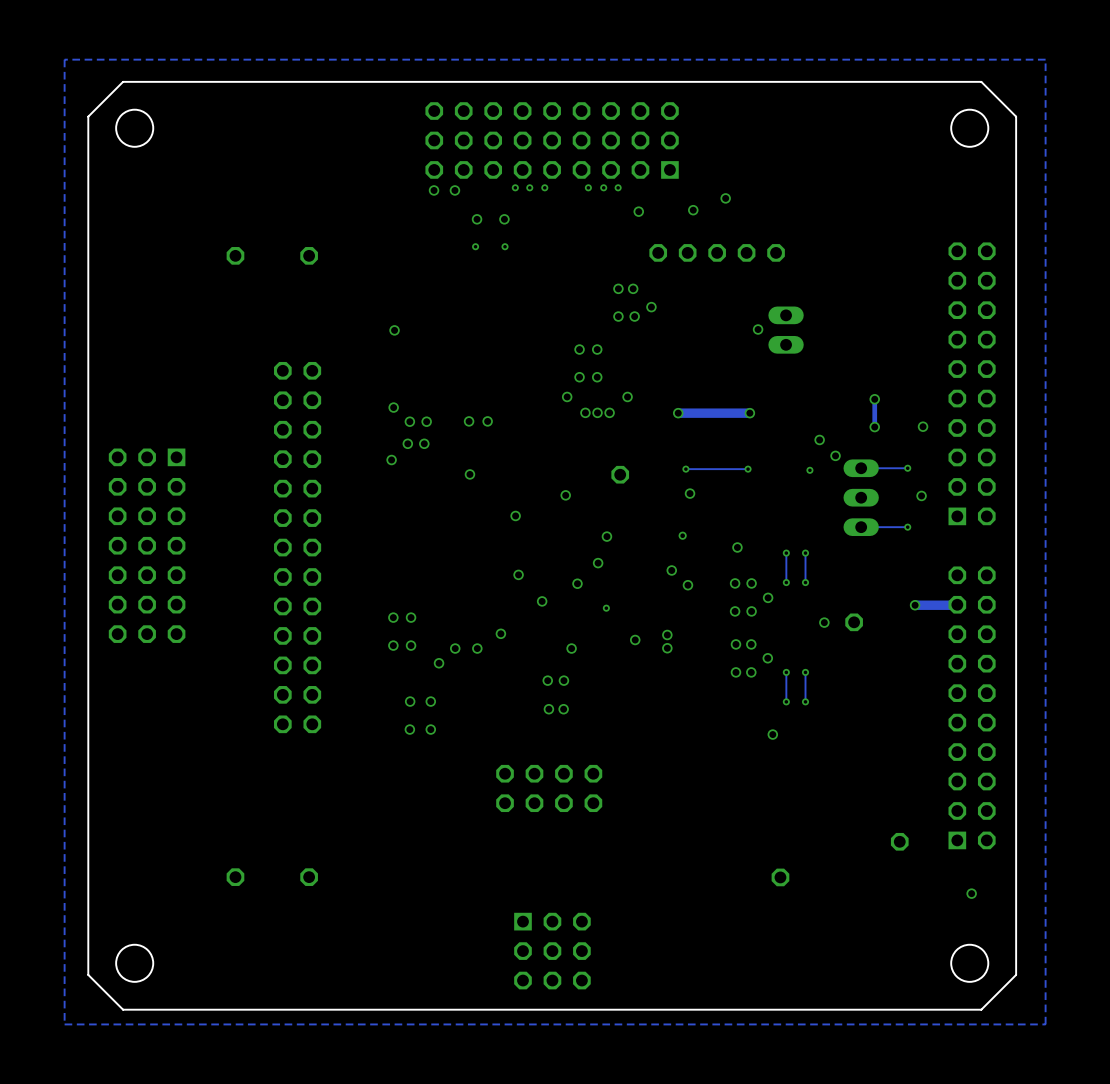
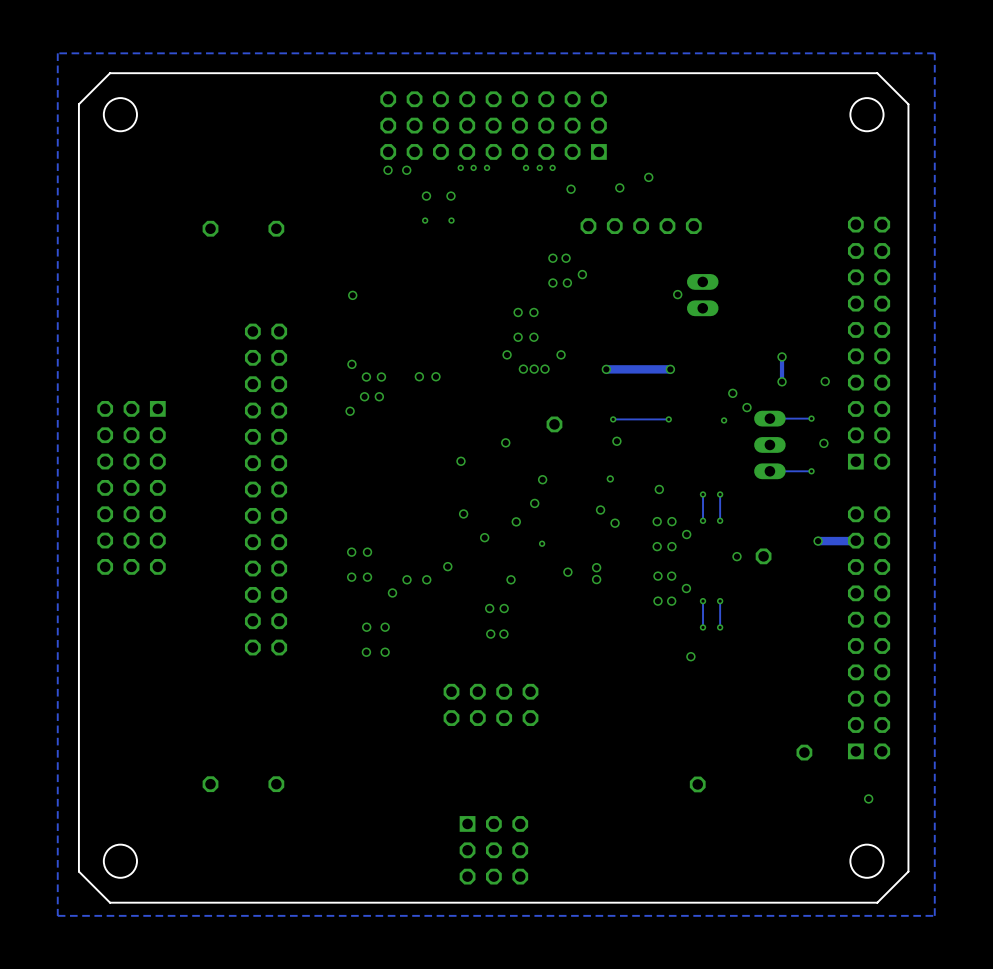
via: (469, 474) -> none

